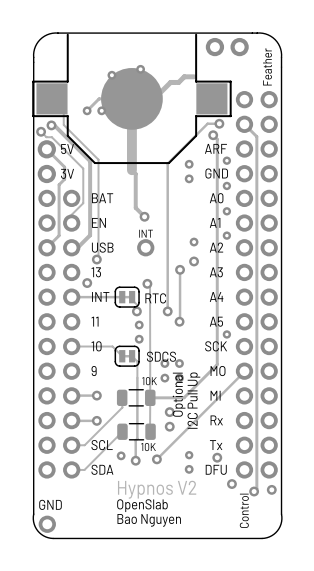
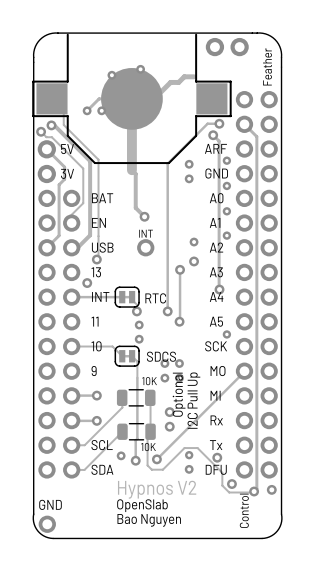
track: (217, 139) (217, 364) (184, 397) (150, 397) -> (217, 139) (219, 141) (219, 289)
track: (147, 283) (150, 286) (150, 397) -> none
via: (147, 283) -> none
via: none -> (219, 289)
track: (150, 397) (150, 431) -> (150, 397) (150, 431) (147, 434) (147, 465) (151, 469) (162, 469) (184, 448) (197, 448) (222, 472) (222, 485) (229, 492) (254, 491)

